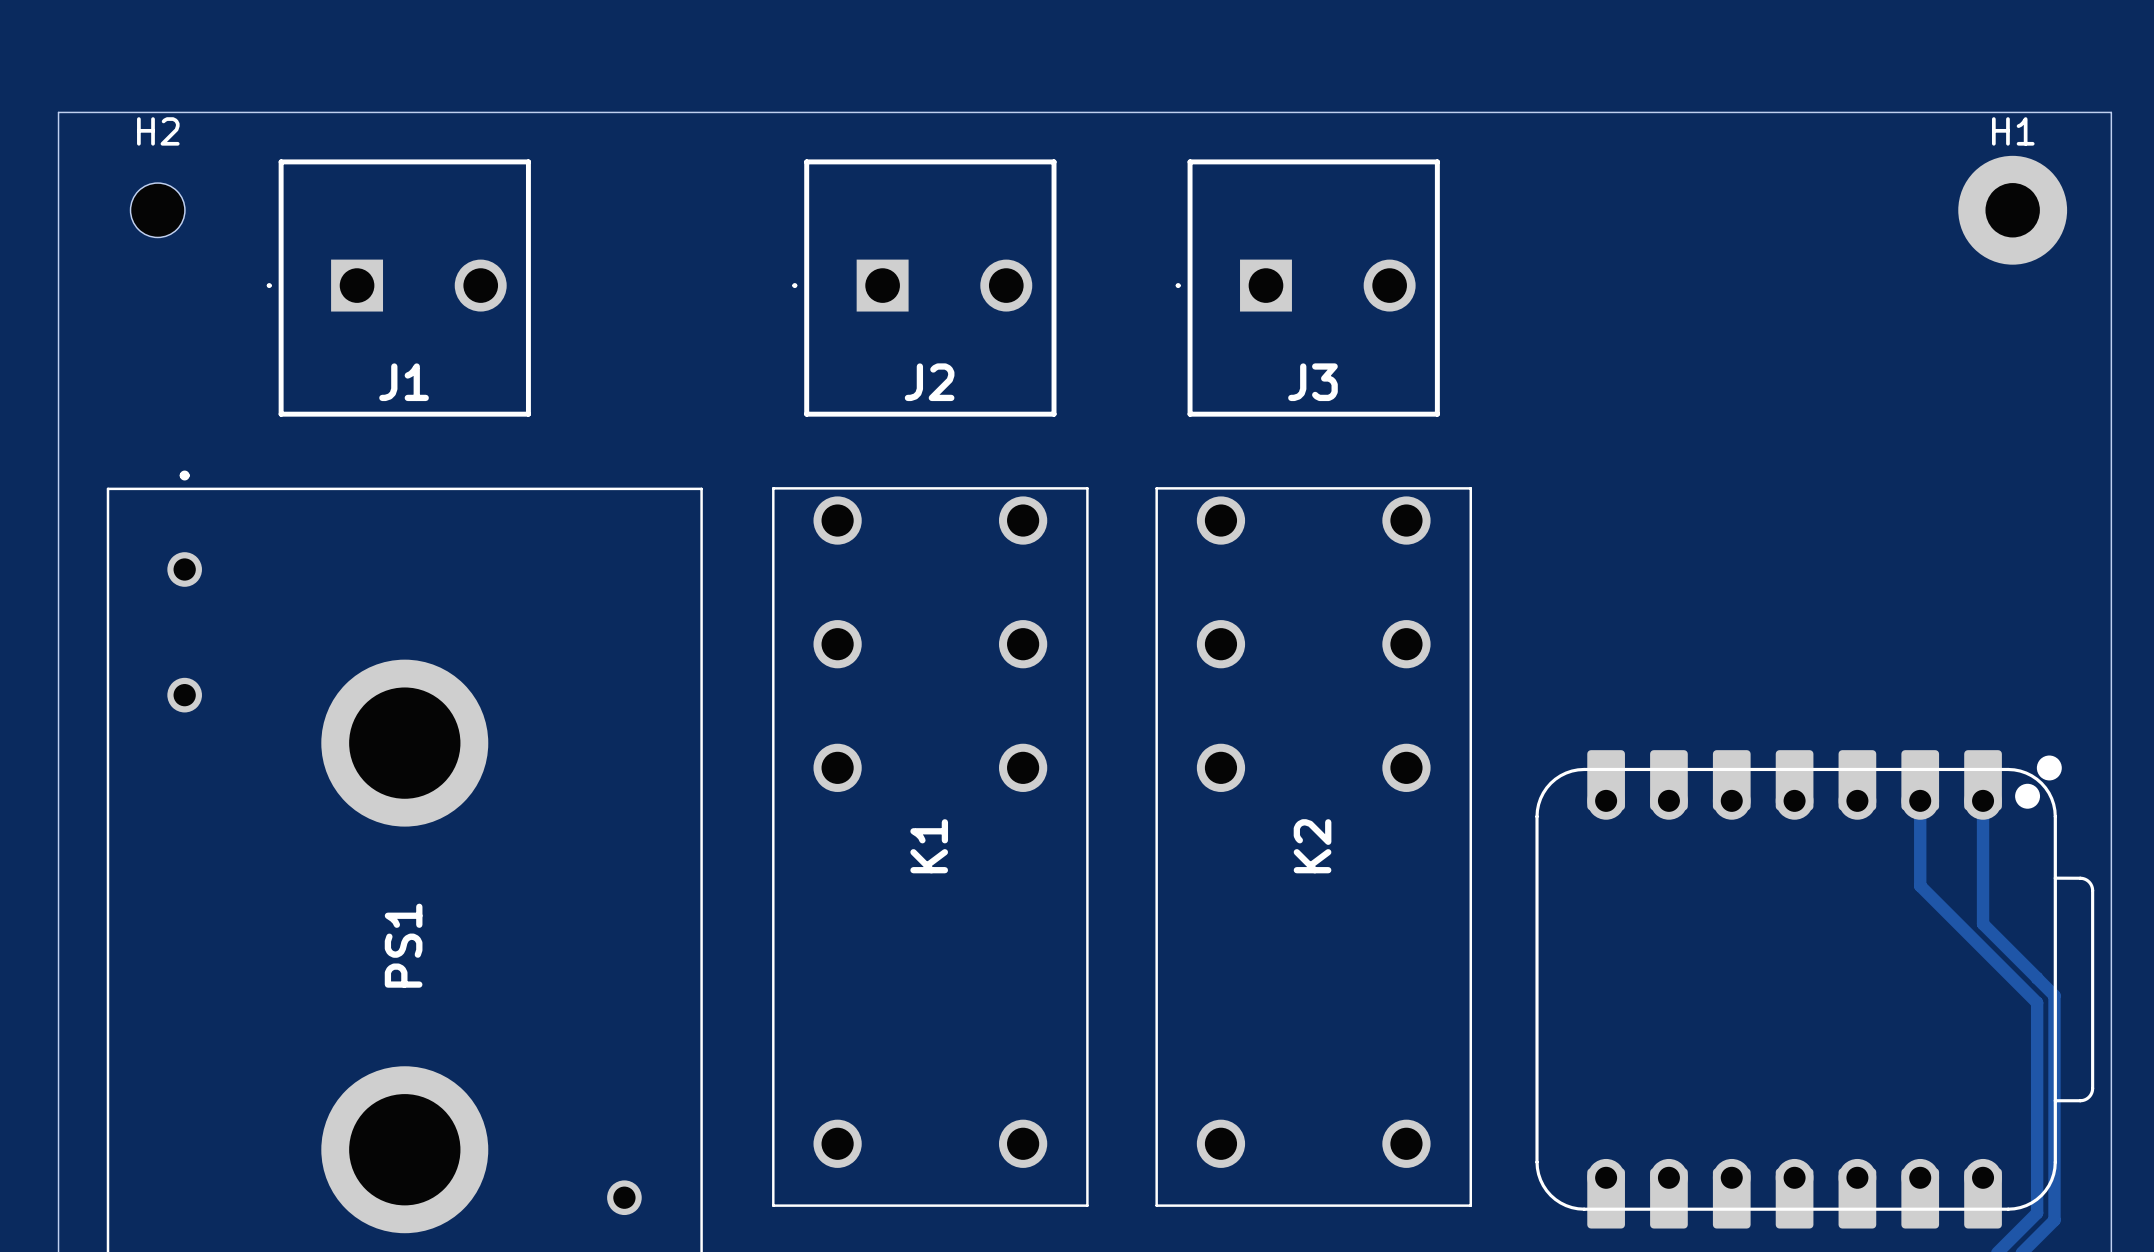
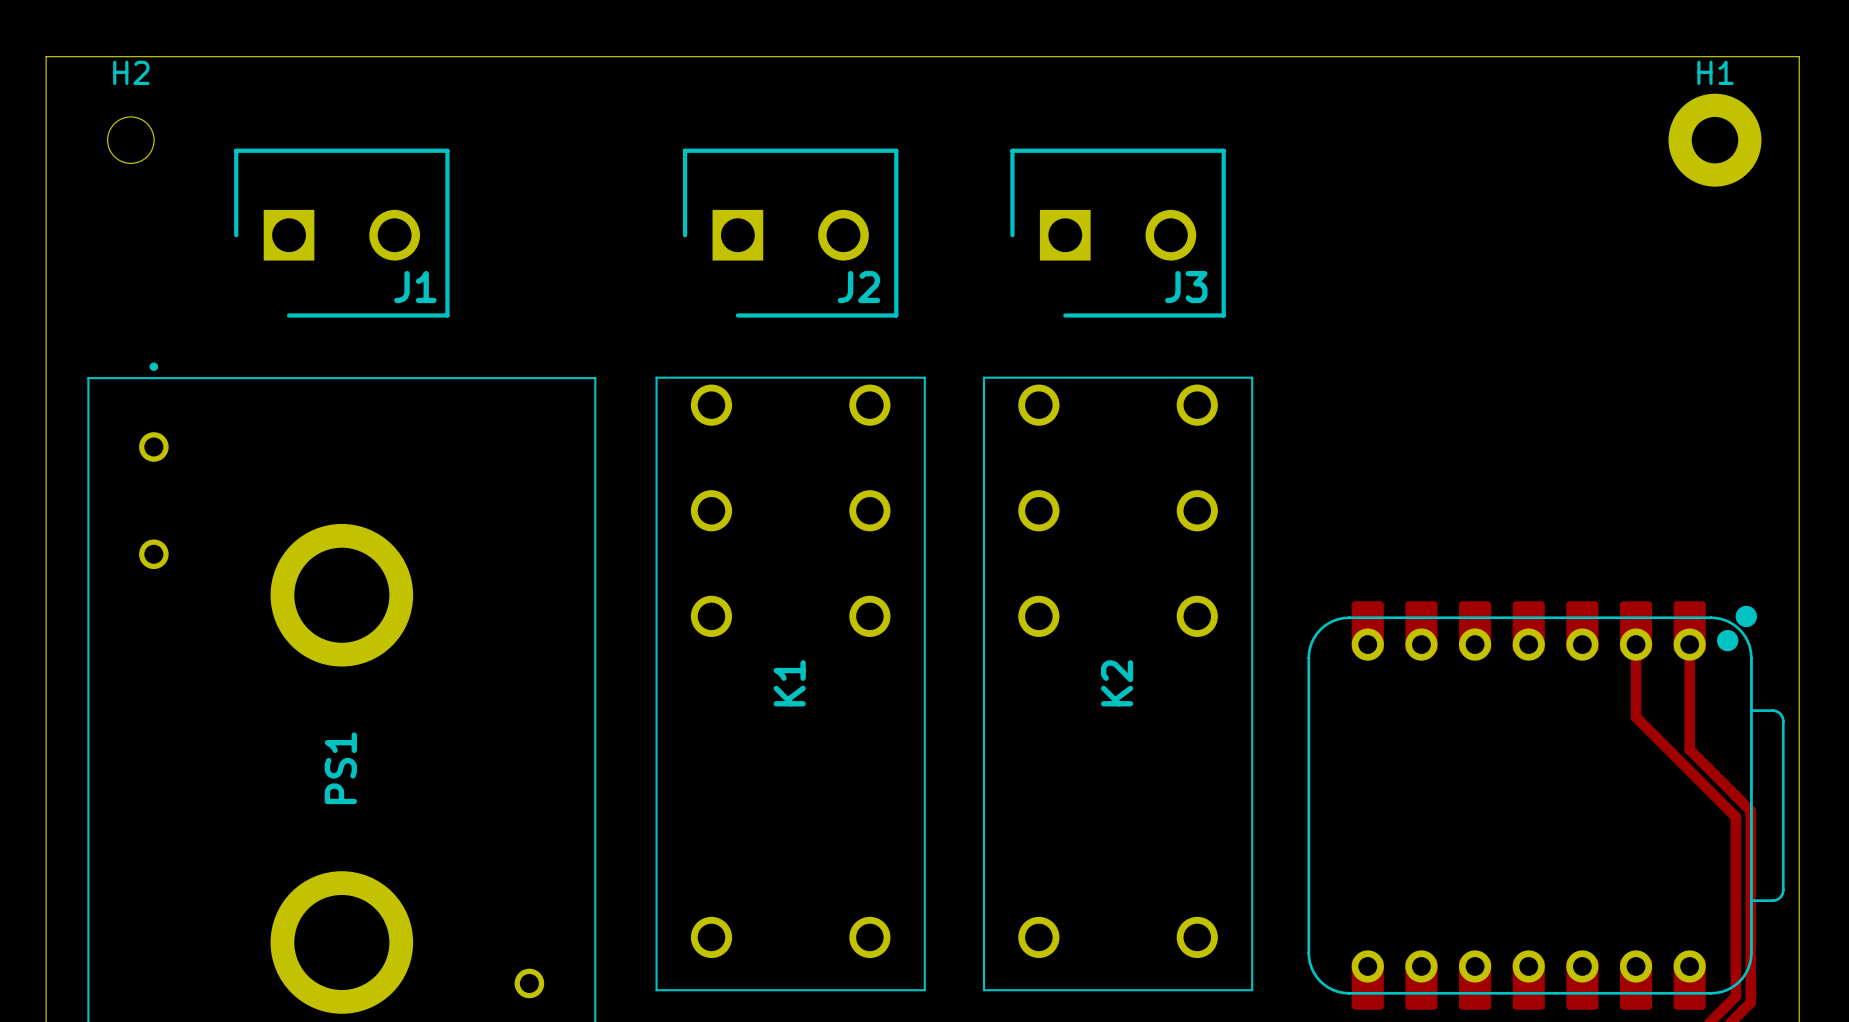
J1 footprint: [266, 159, 531, 417] -> [234, 148, 450, 318]
J2 footprint: [792, 159, 1057, 417] -> [682, 148, 899, 318]
J3 footprint: [1175, 159, 1440, 417] -> [1010, 148, 1226, 318]
J1 name position: J1 (404, 382) -> J1 (415, 287)
J2 name position: J2 (929, 382) -> J2 (858, 287)
J3 name position: J3 (1312, 382) -> J3 (1186, 287)

